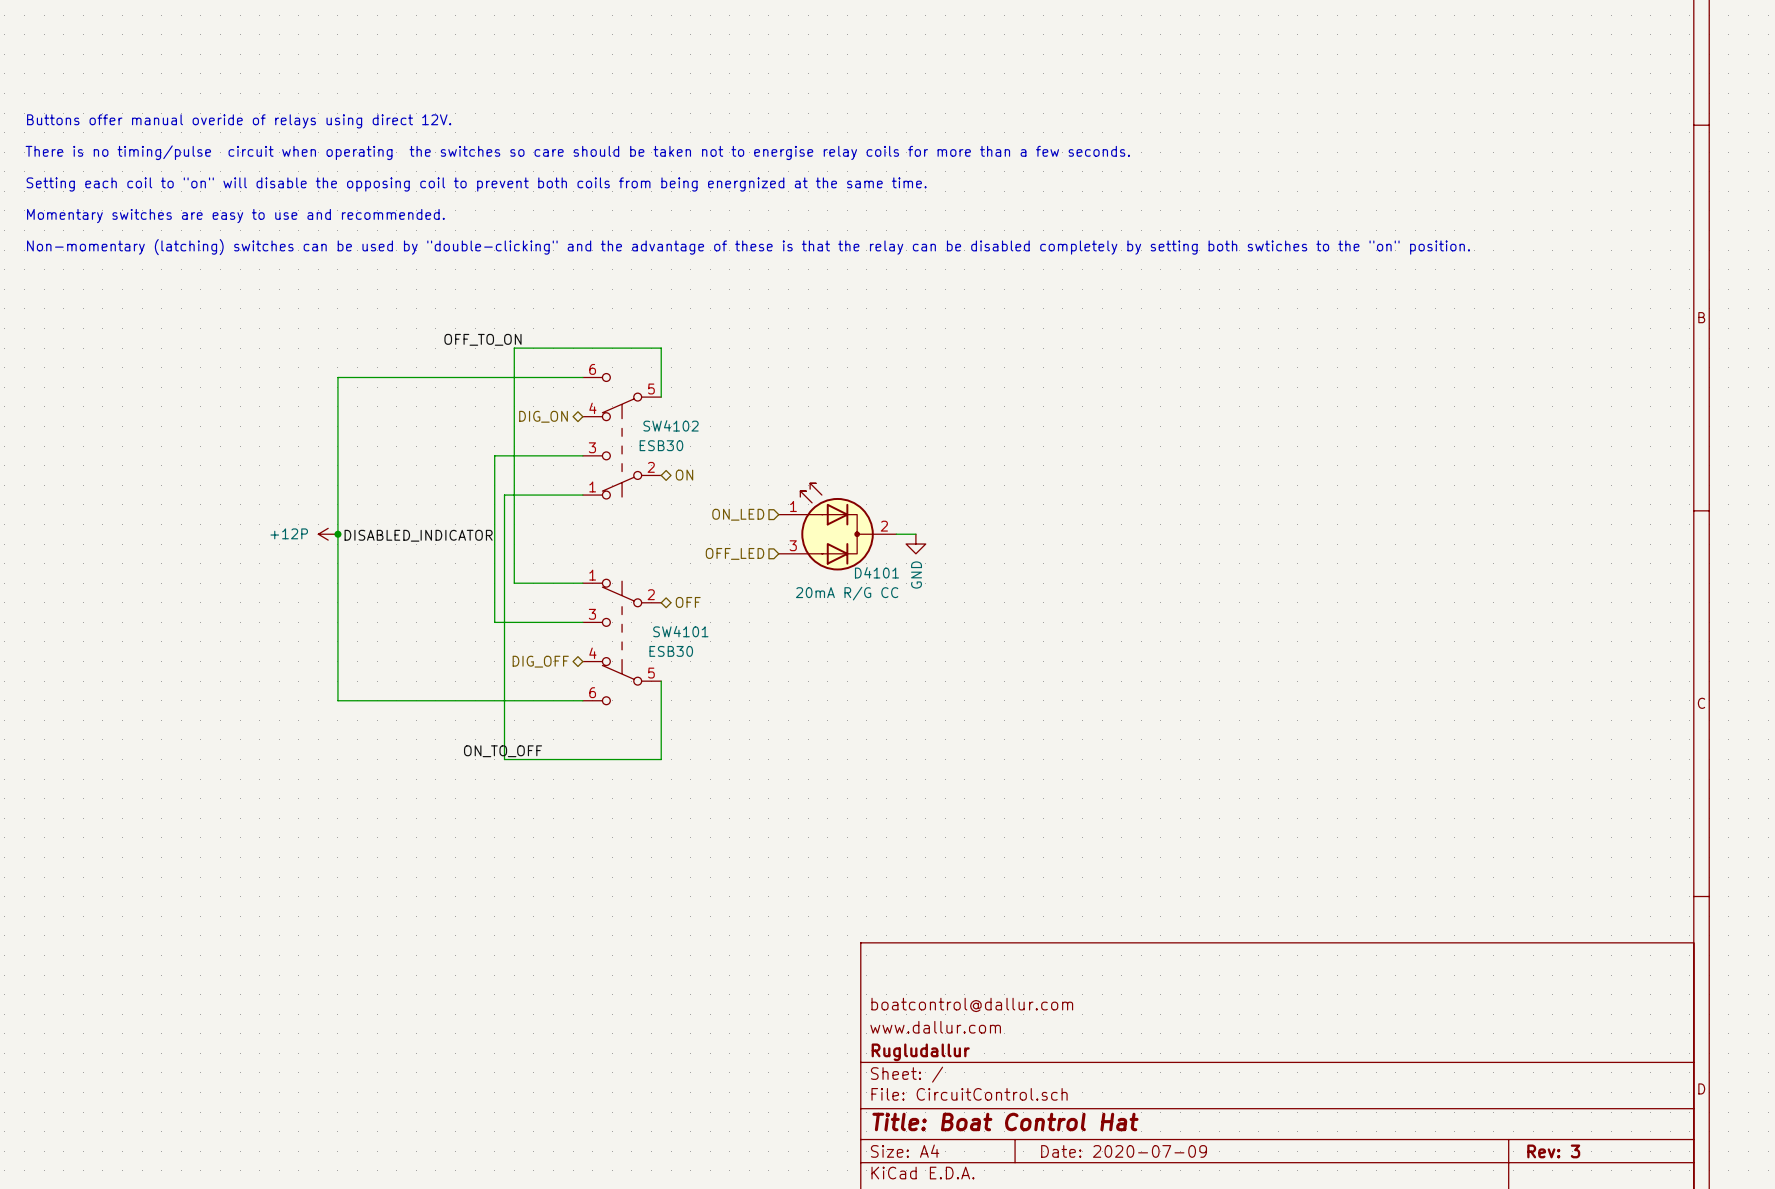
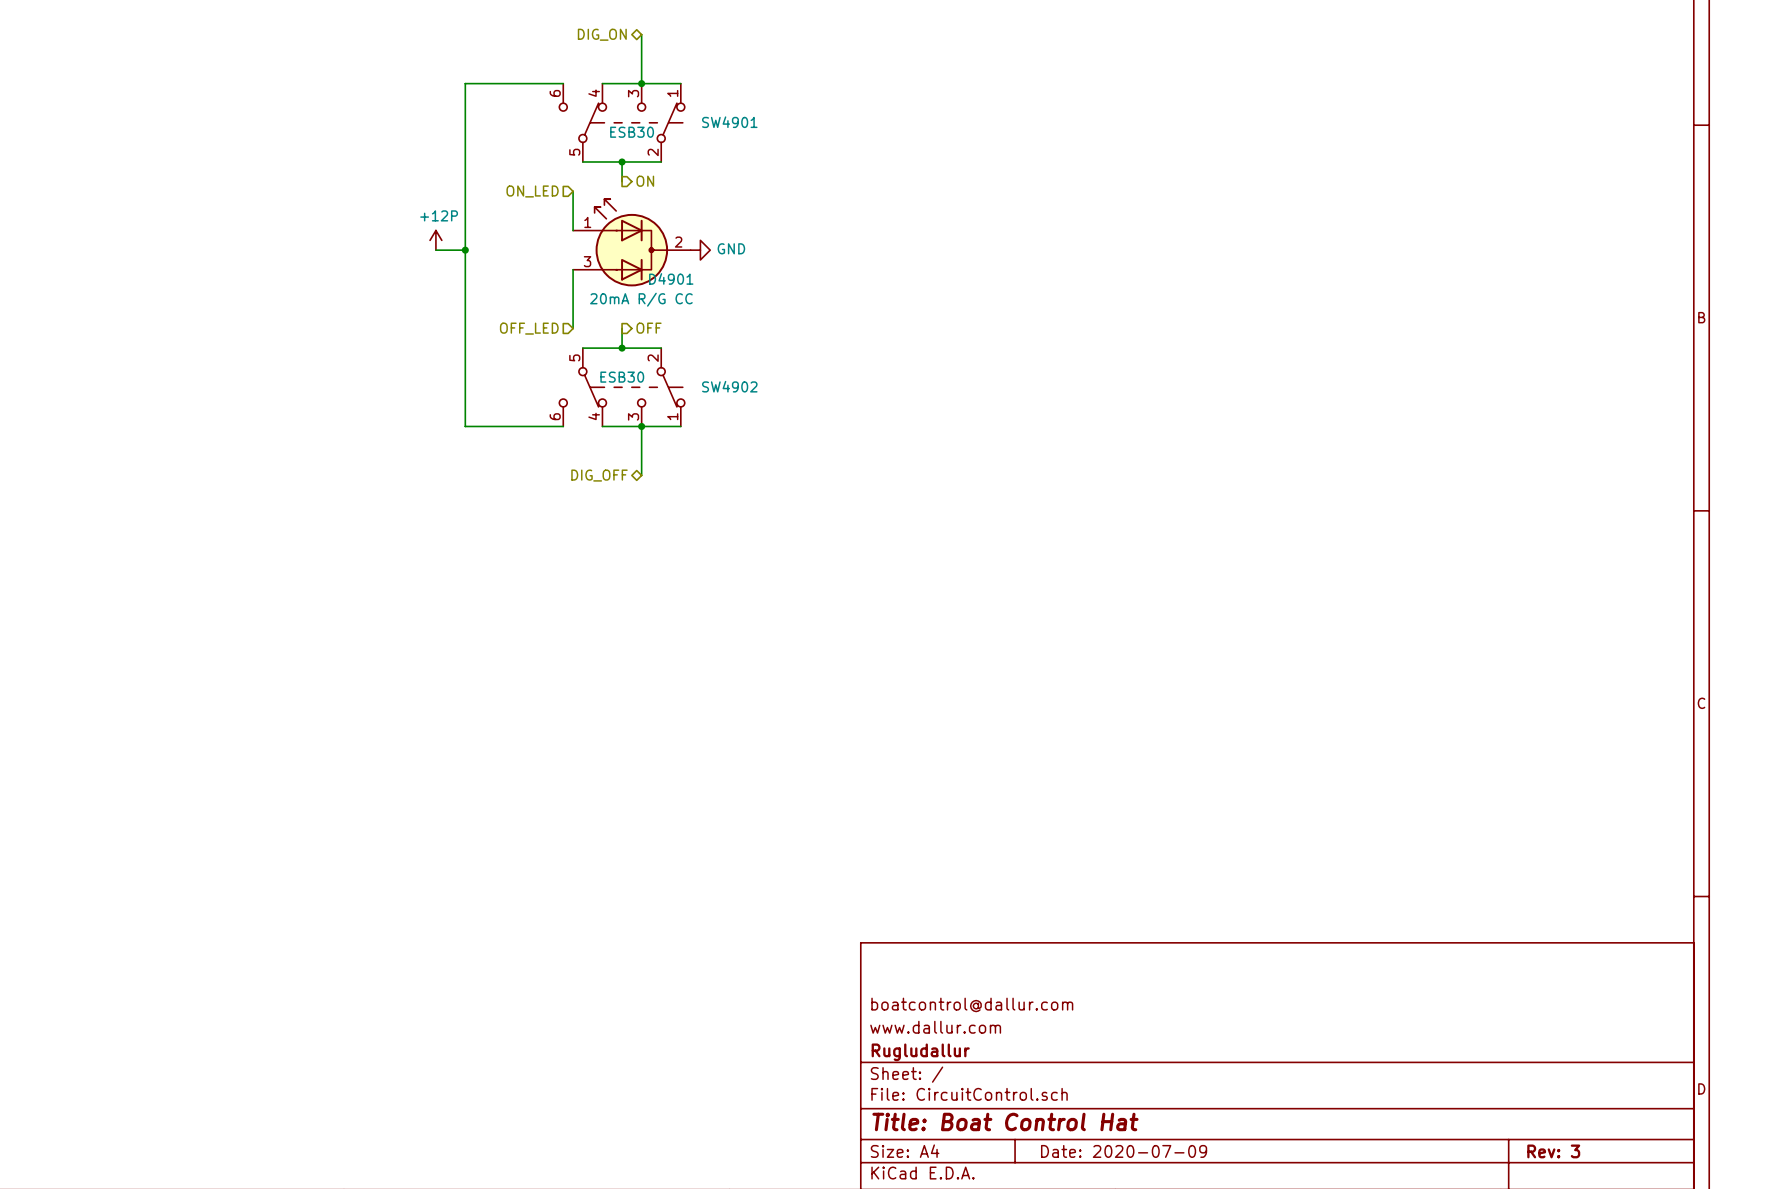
hierarchical label: none -> DIG_ON (602, 34)
wire: none -> (641, 34) (641, 83)
wire: none -> (563, 83) (465, 83) (465, 426) (563, 426)
wire: none -> (602, 83) (680, 83)
junction: none -> (641, 83)
text: Buttons offer manual overide of relays using direct 12V. (239, 121) -> none
SW4901: none -> ESB30 (622, 122)
text: There is no timing/pulse circuit when operating the switches so care should be taken not to energise relay coils for more than a few seconds. (577, 152) -> none
wire: none -> (582, 161) (661, 161)
wire: none -> (622, 161) (622, 181)
junction: none -> (622, 161)
hierarchical label: none -> ON (645, 181)
text: Setting each coil to "on" will disable the opposing coil to prevent both coils from being energnized at the same time. (476, 184) -> none
hierarchical label: none -> ON_LED (532, 191)
wire: none -> (573, 191) (573, 230)
text: Momentary switches are easy to use and recommended. (235, 216) -> none
power symbol: none -> +12P (435, 240)
D4901: none -> 20mA R/G CC (631, 242)
text: Non-momentary (latching) switches can be used by "double-clicking" and the advantage of these is that the relay can be disabled completely by setting both swtiches to the "on" position. (748, 247) -> none
junction: none -> (465, 250)
power symbol: none -> GND (700, 250)
wire: none -> (573, 269) (573, 328)
hierarchical label: none -> OFF_LED (529, 328)
wire: none -> (622, 328) (622, 348)
hierarchical label: none -> OFF (649, 328)
label: OFF_TO_ON (482, 339) -> none
wire: (582, 348) (514, 348) (514, 583) (582, 583) -> none
junction: none -> (622, 348)
wire: (661, 348) (661, 397) -> (641, 426) (641, 475)
wire: (582, 377) (337, 377) (337, 700) (582, 700) -> none
SW4902: none -> ESB30 (622, 387)
hierarchical label: DIG_ON (543, 416) -> none
wire: none -> (602, 426) (680, 426)
junction: none -> (641, 426)
SW4102: ESB30 (622, 436) -> none
wire: (582, 455) (494, 455) (494, 622) (582, 622) -> none
hierarchical label: none -> DIG_OFF (599, 475)
hierarchical label: ON (684, 475) -> none
wire: (582, 495) (504, 495) (504, 759) (661, 759) (661, 681) -> none
hierarchical label: ON_LED (738, 514) -> none
D4101: 20mA R/G CC (837, 526) -> none
power symbol: +12P (328, 534) -> none
junction: (337, 534) -> none
wire: (896, 534) (915, 534) -> none
label: DISABLED_INDICATOR (418, 535) -> none
power symbol: GND (915, 544) -> none
hierarchical label: OFF_LED (735, 553) -> none
hierarchical label: OFF (688, 602) -> none
SW4101: ESB30 (622, 641) -> none
hierarchical label: DIG_OFF (540, 661) -> none
label: ON_TO_OFF (503, 751) -> none

